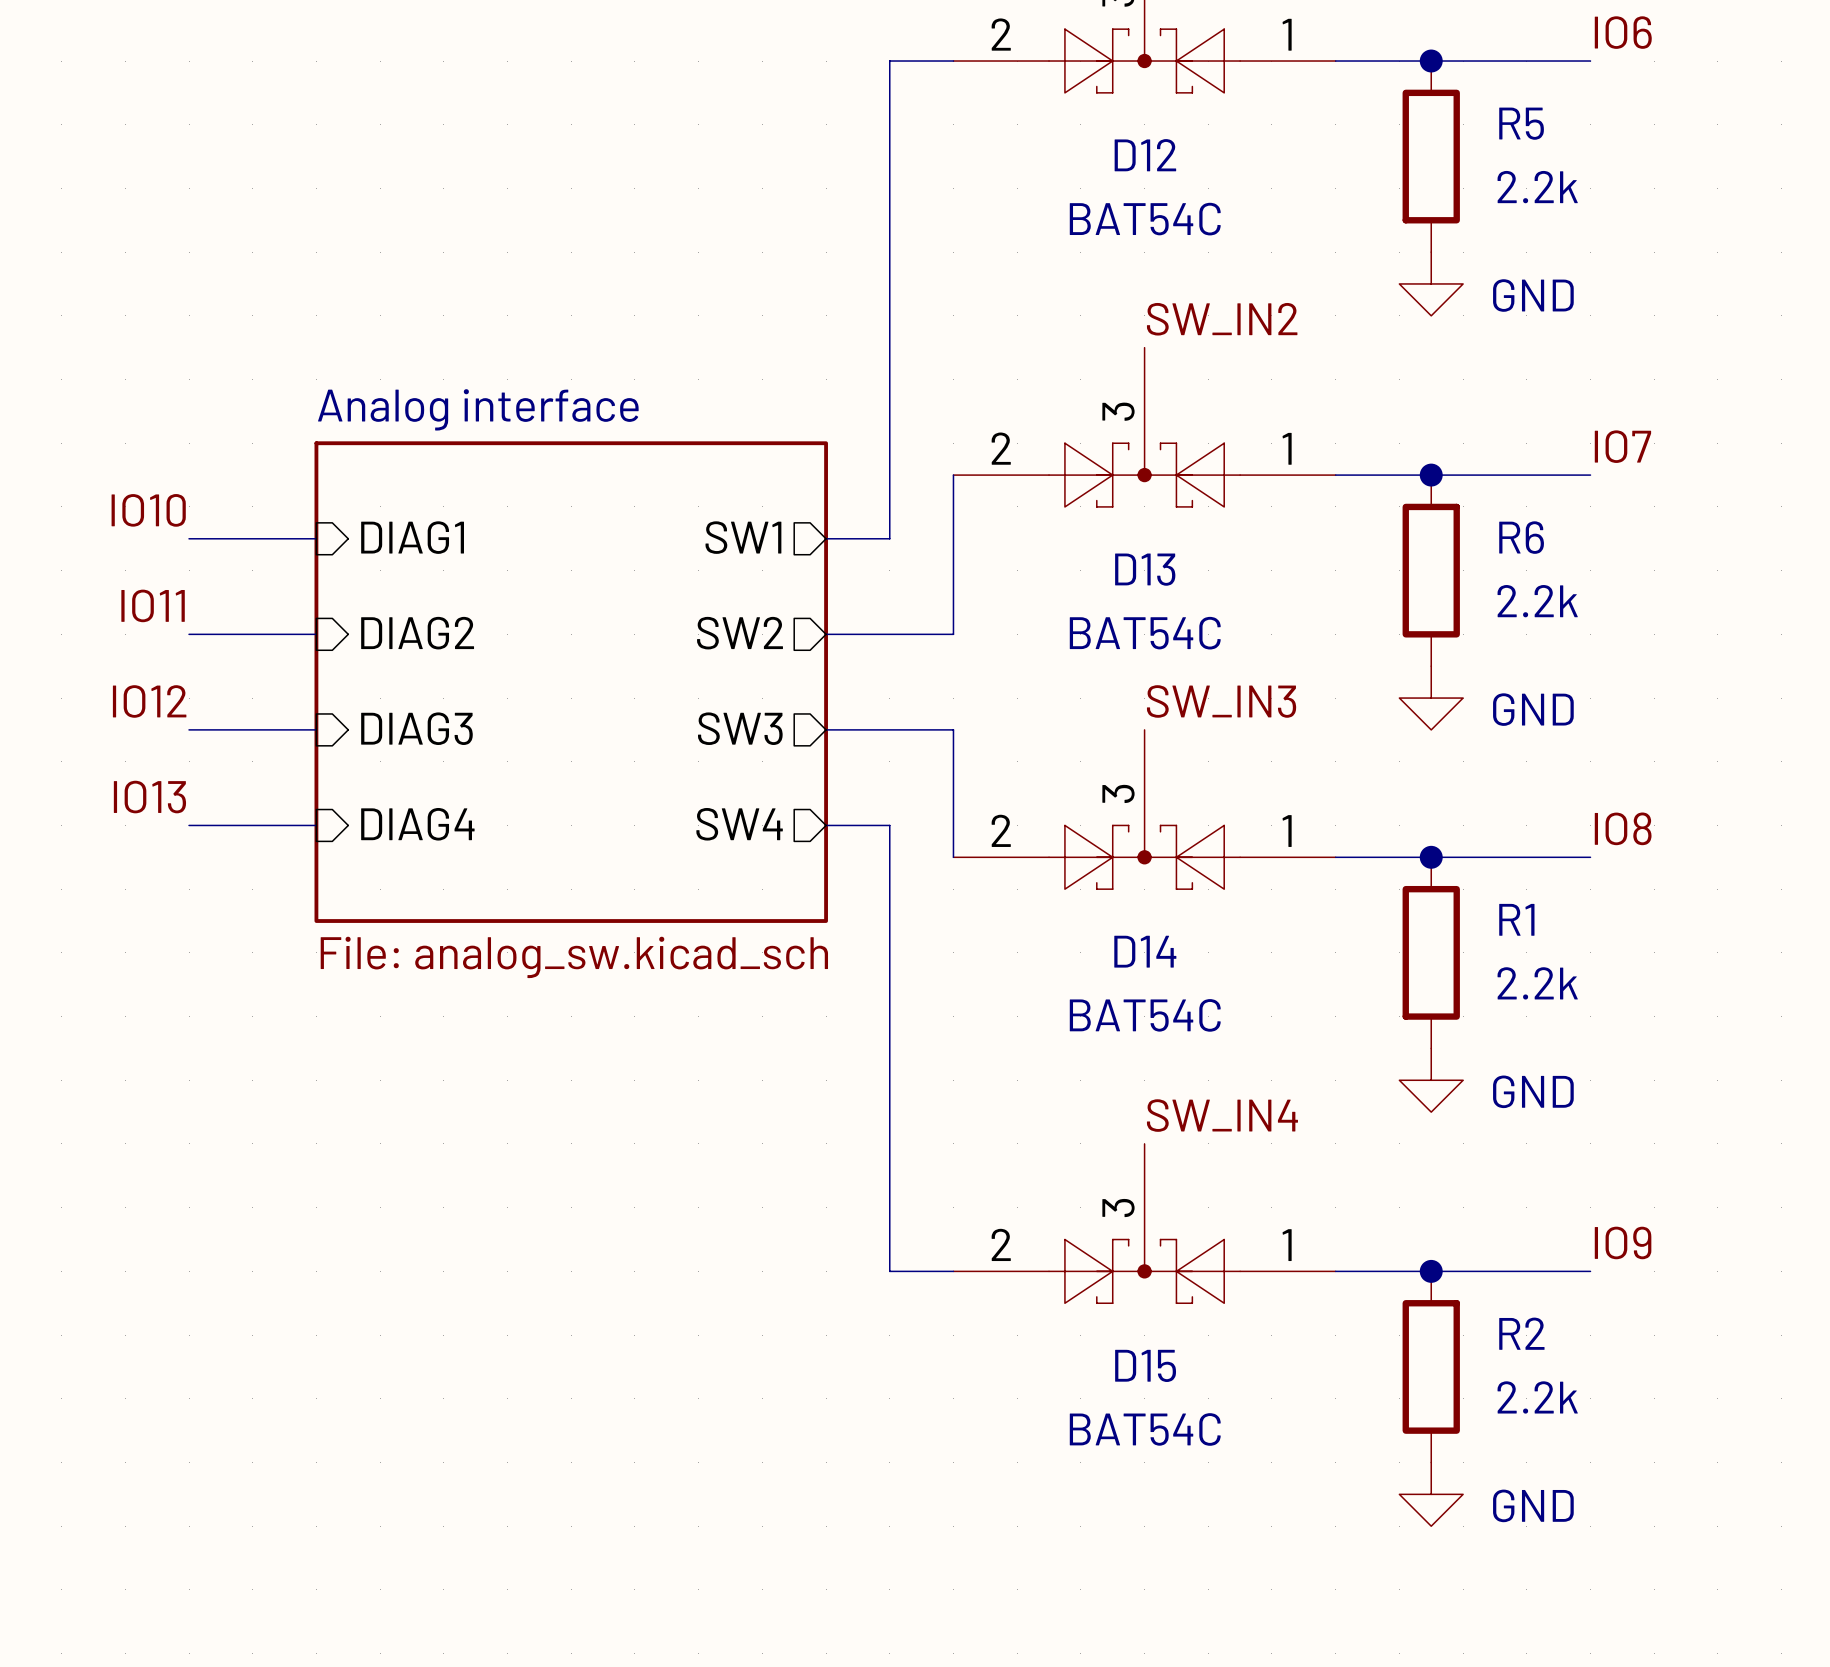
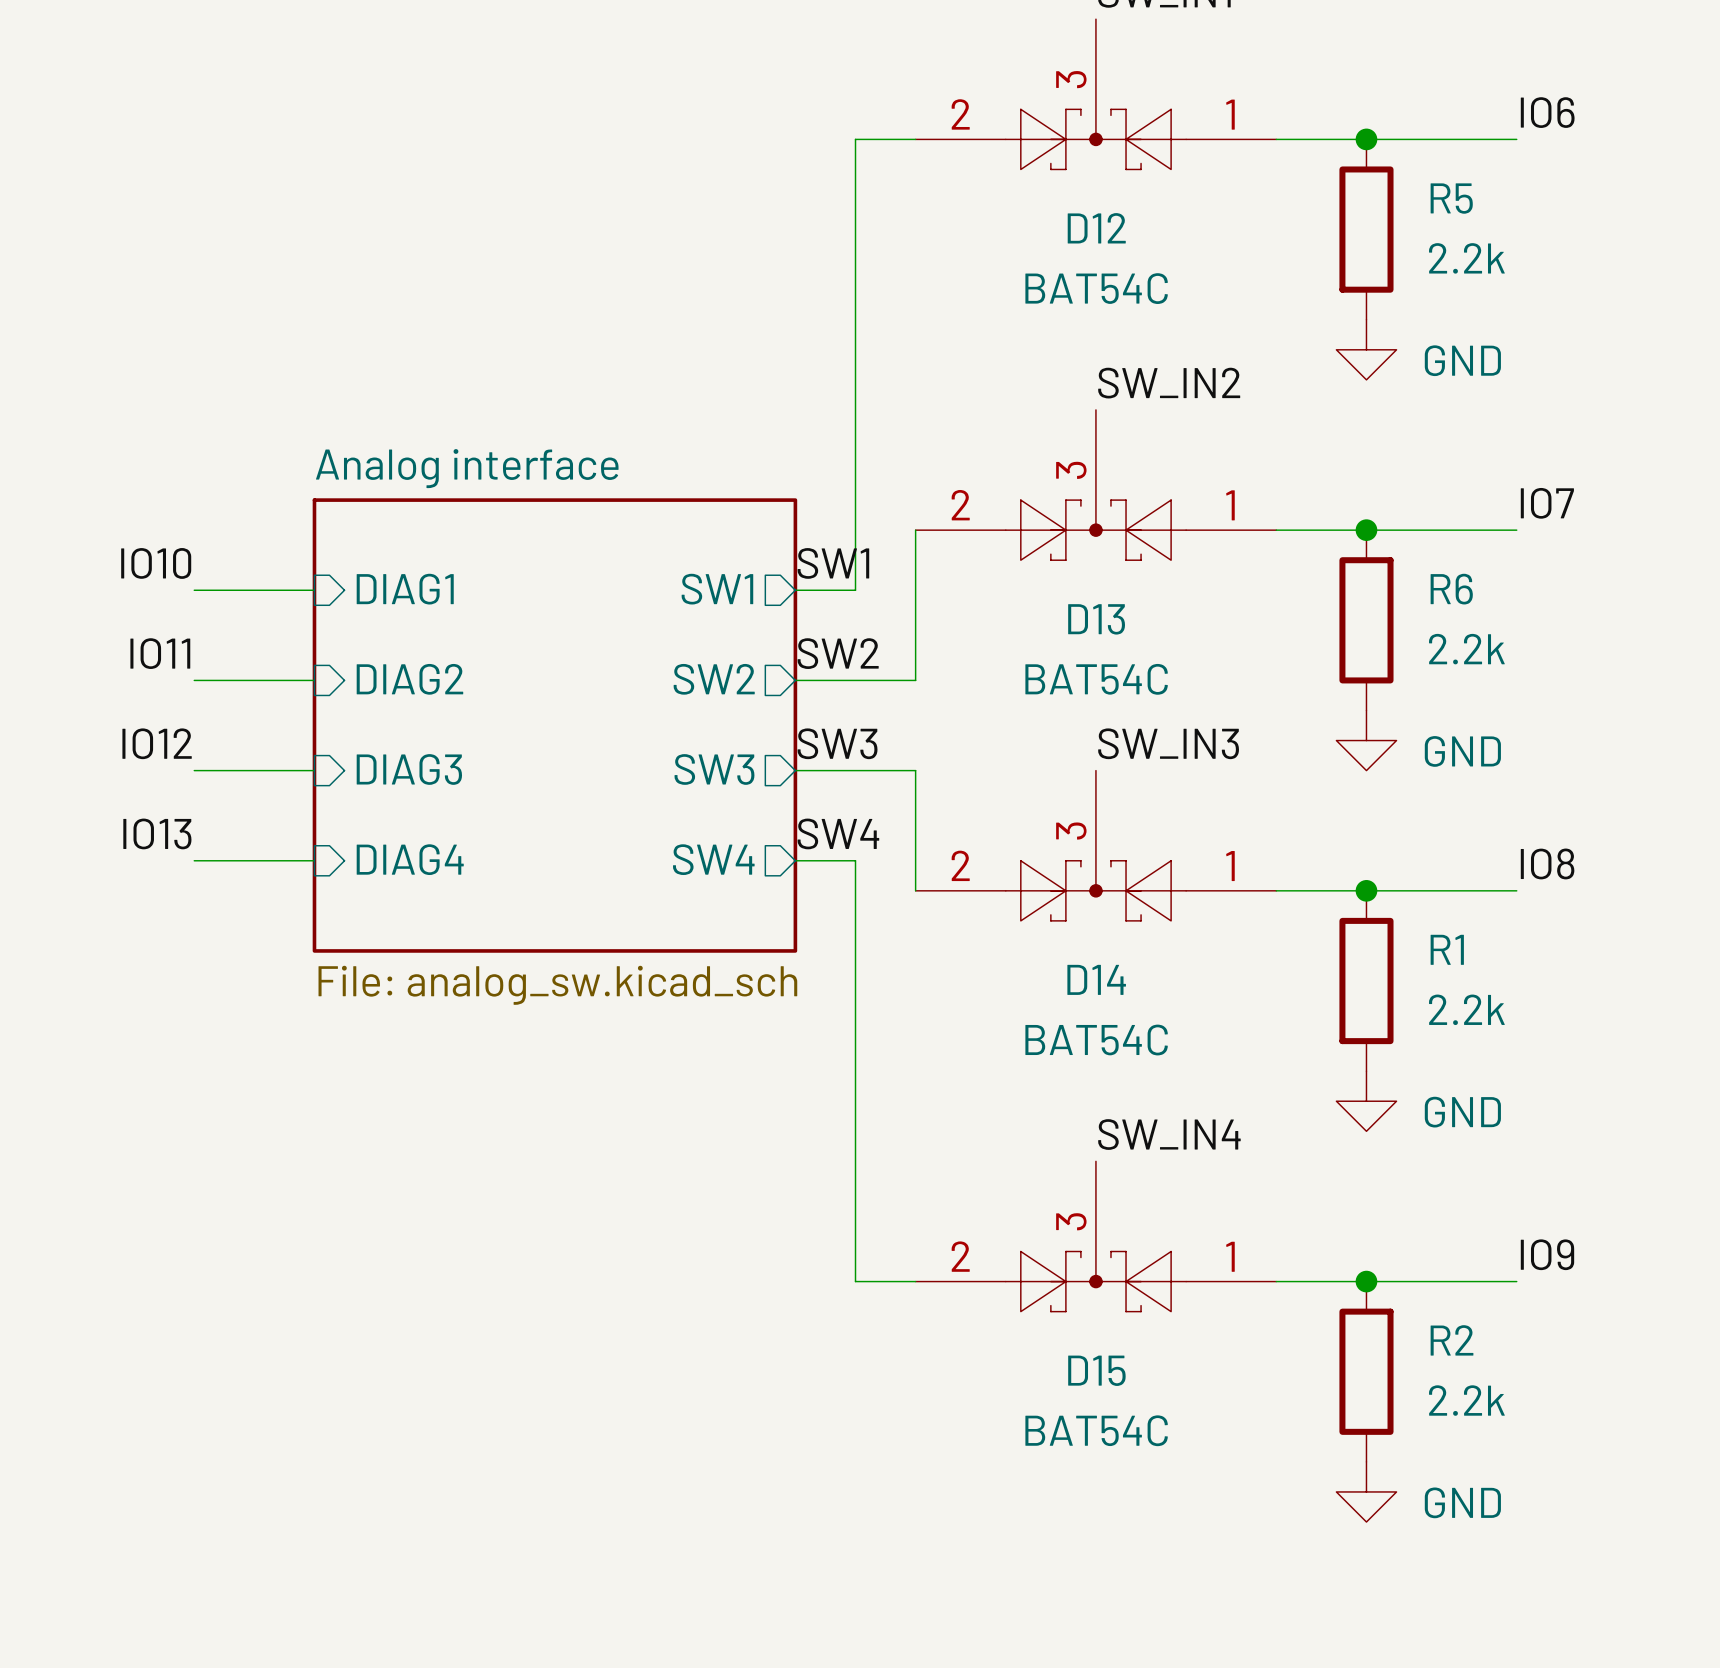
label: none -> SW1 (833, 563)
label: none -> SW2 (838, 653)
label: none -> SW3 (837, 743)
label: none -> SW4 (838, 833)

